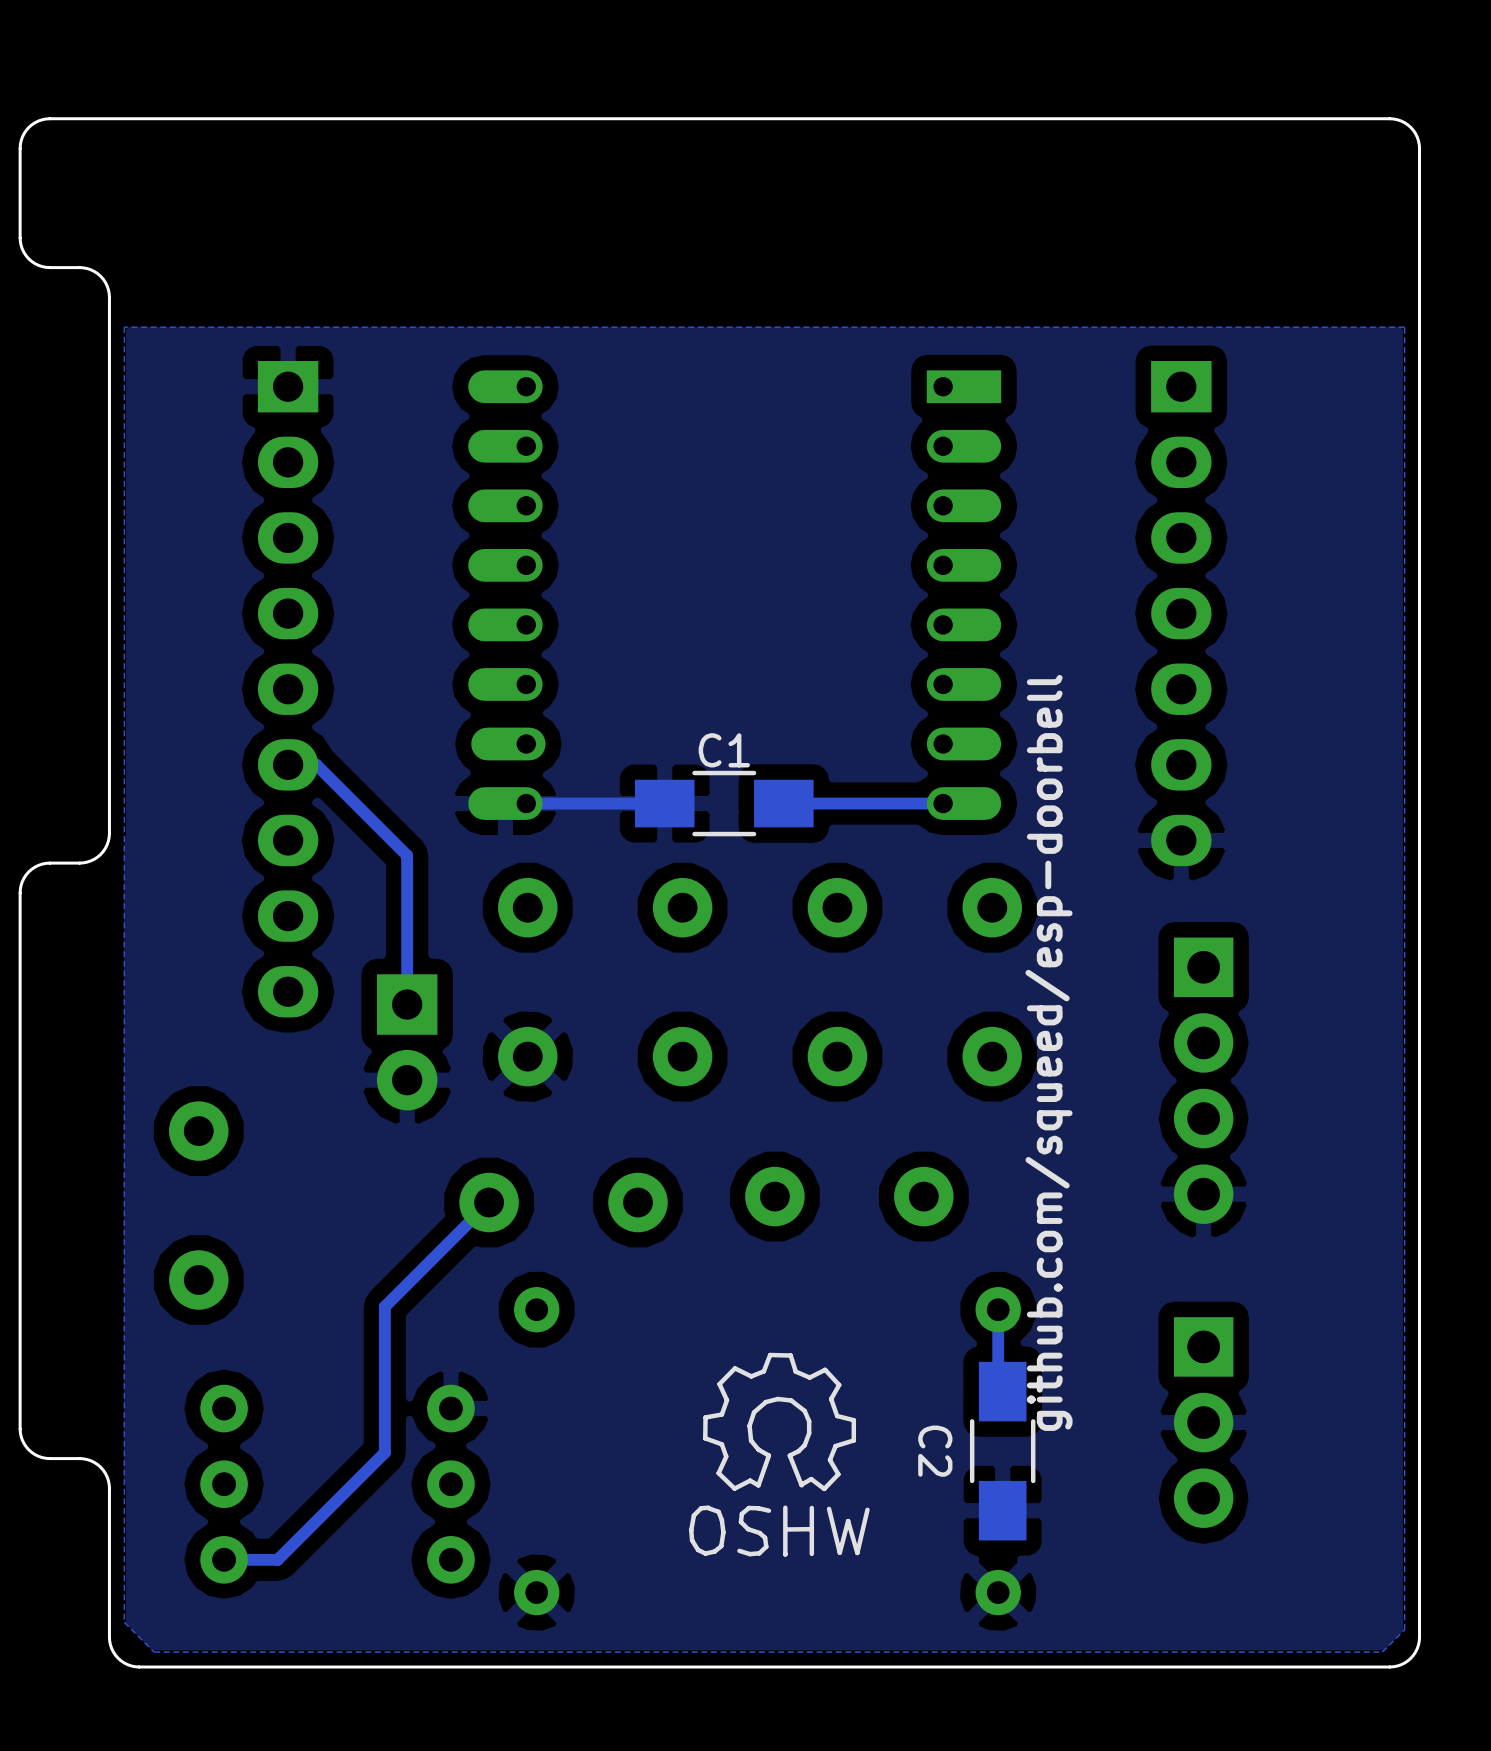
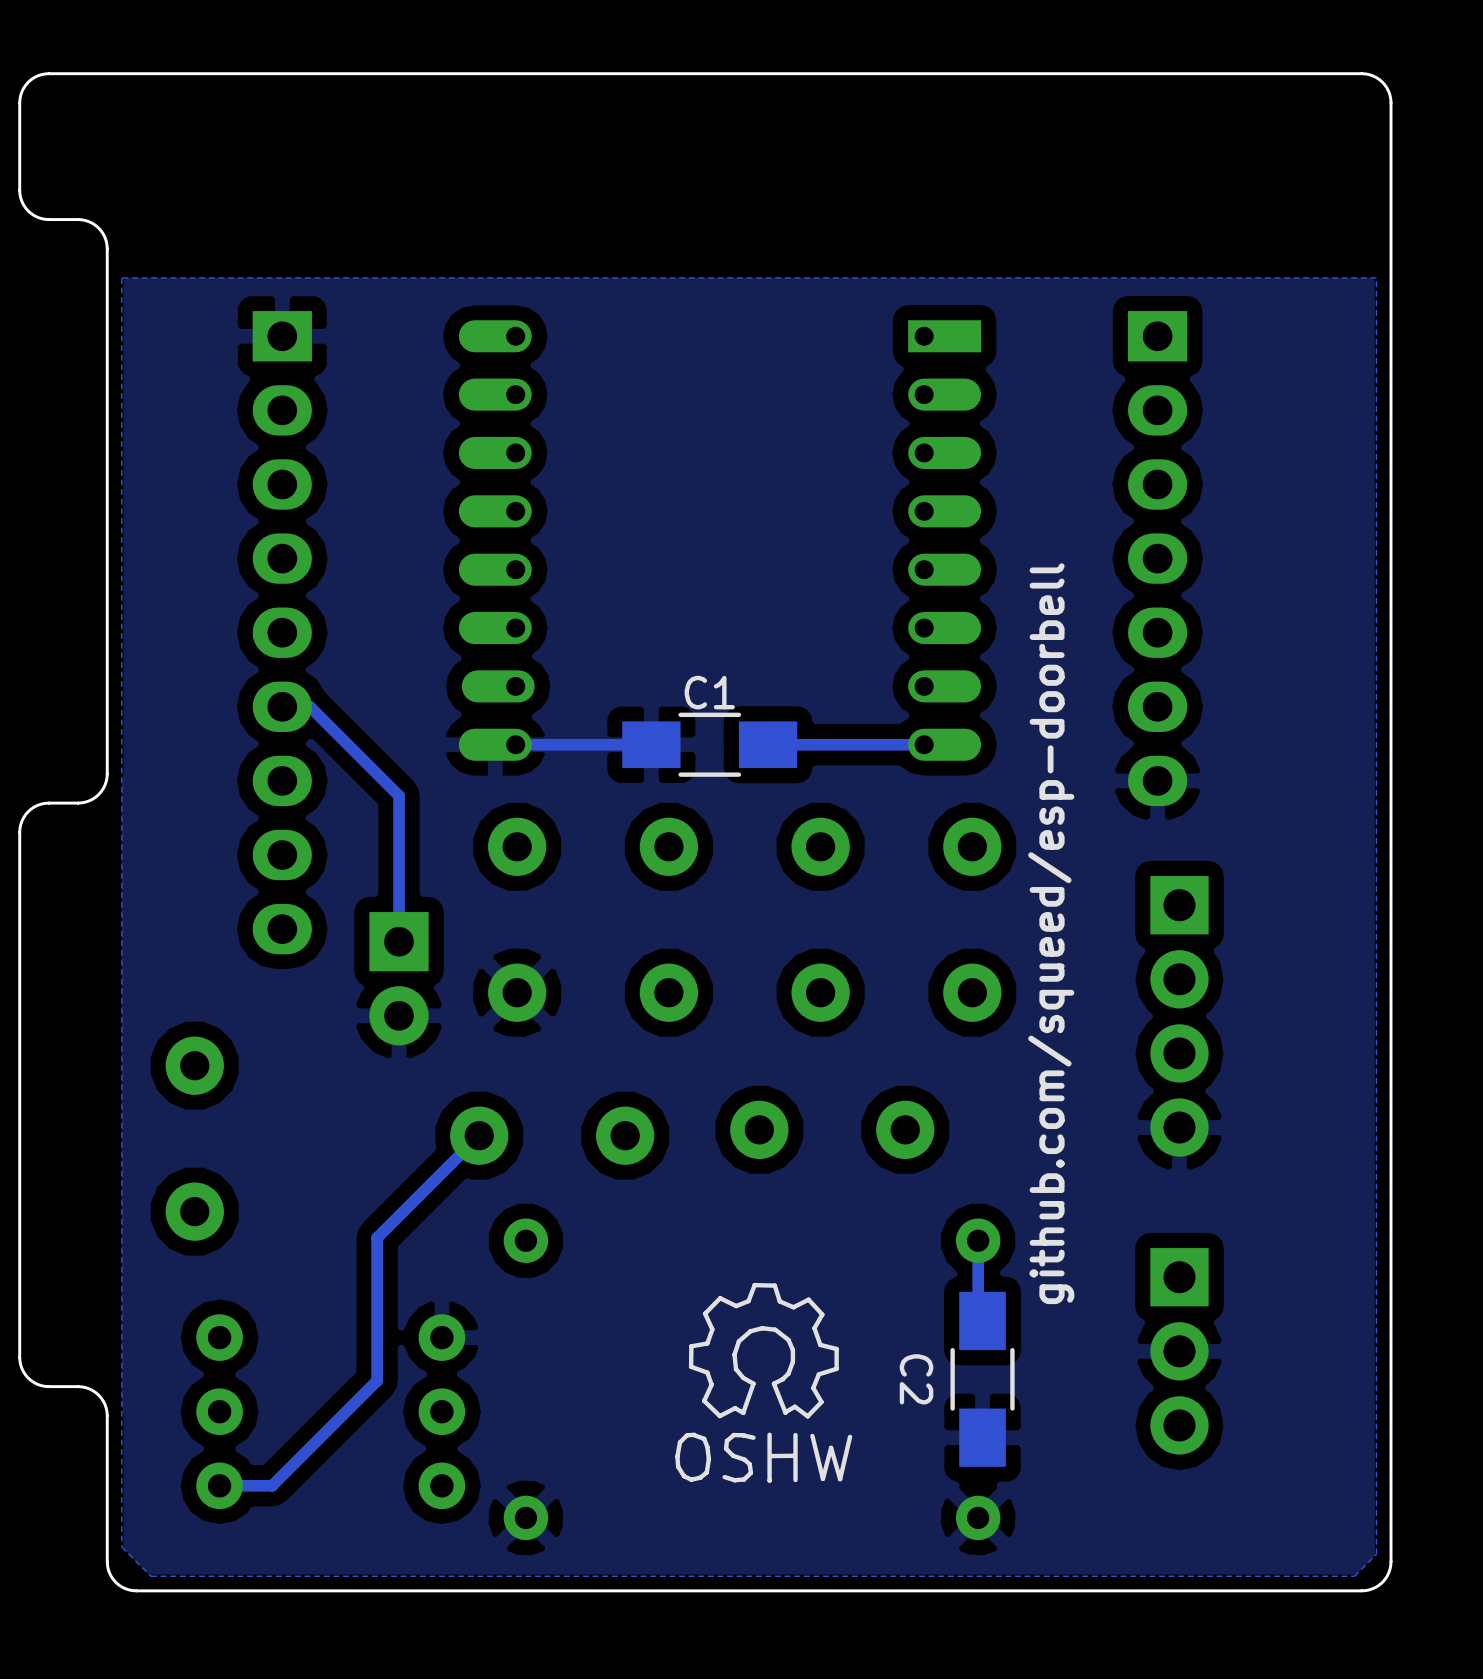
text position: github.com/squeed/esp-doorbell (1048, 1052) -> github.com/squeed/esp-doorbell (1051, 933)

